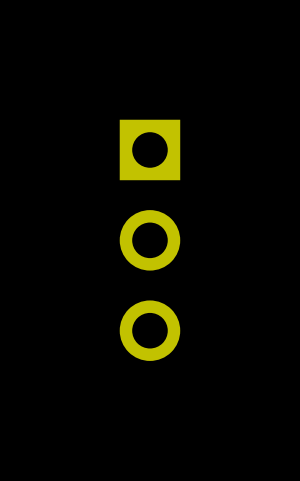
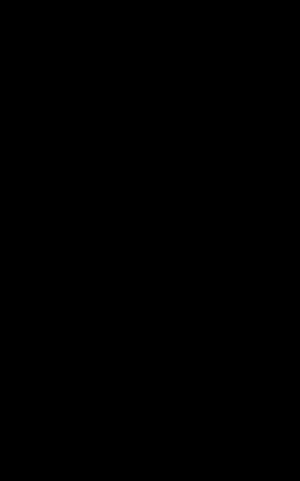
part: (149, 240) -> none

